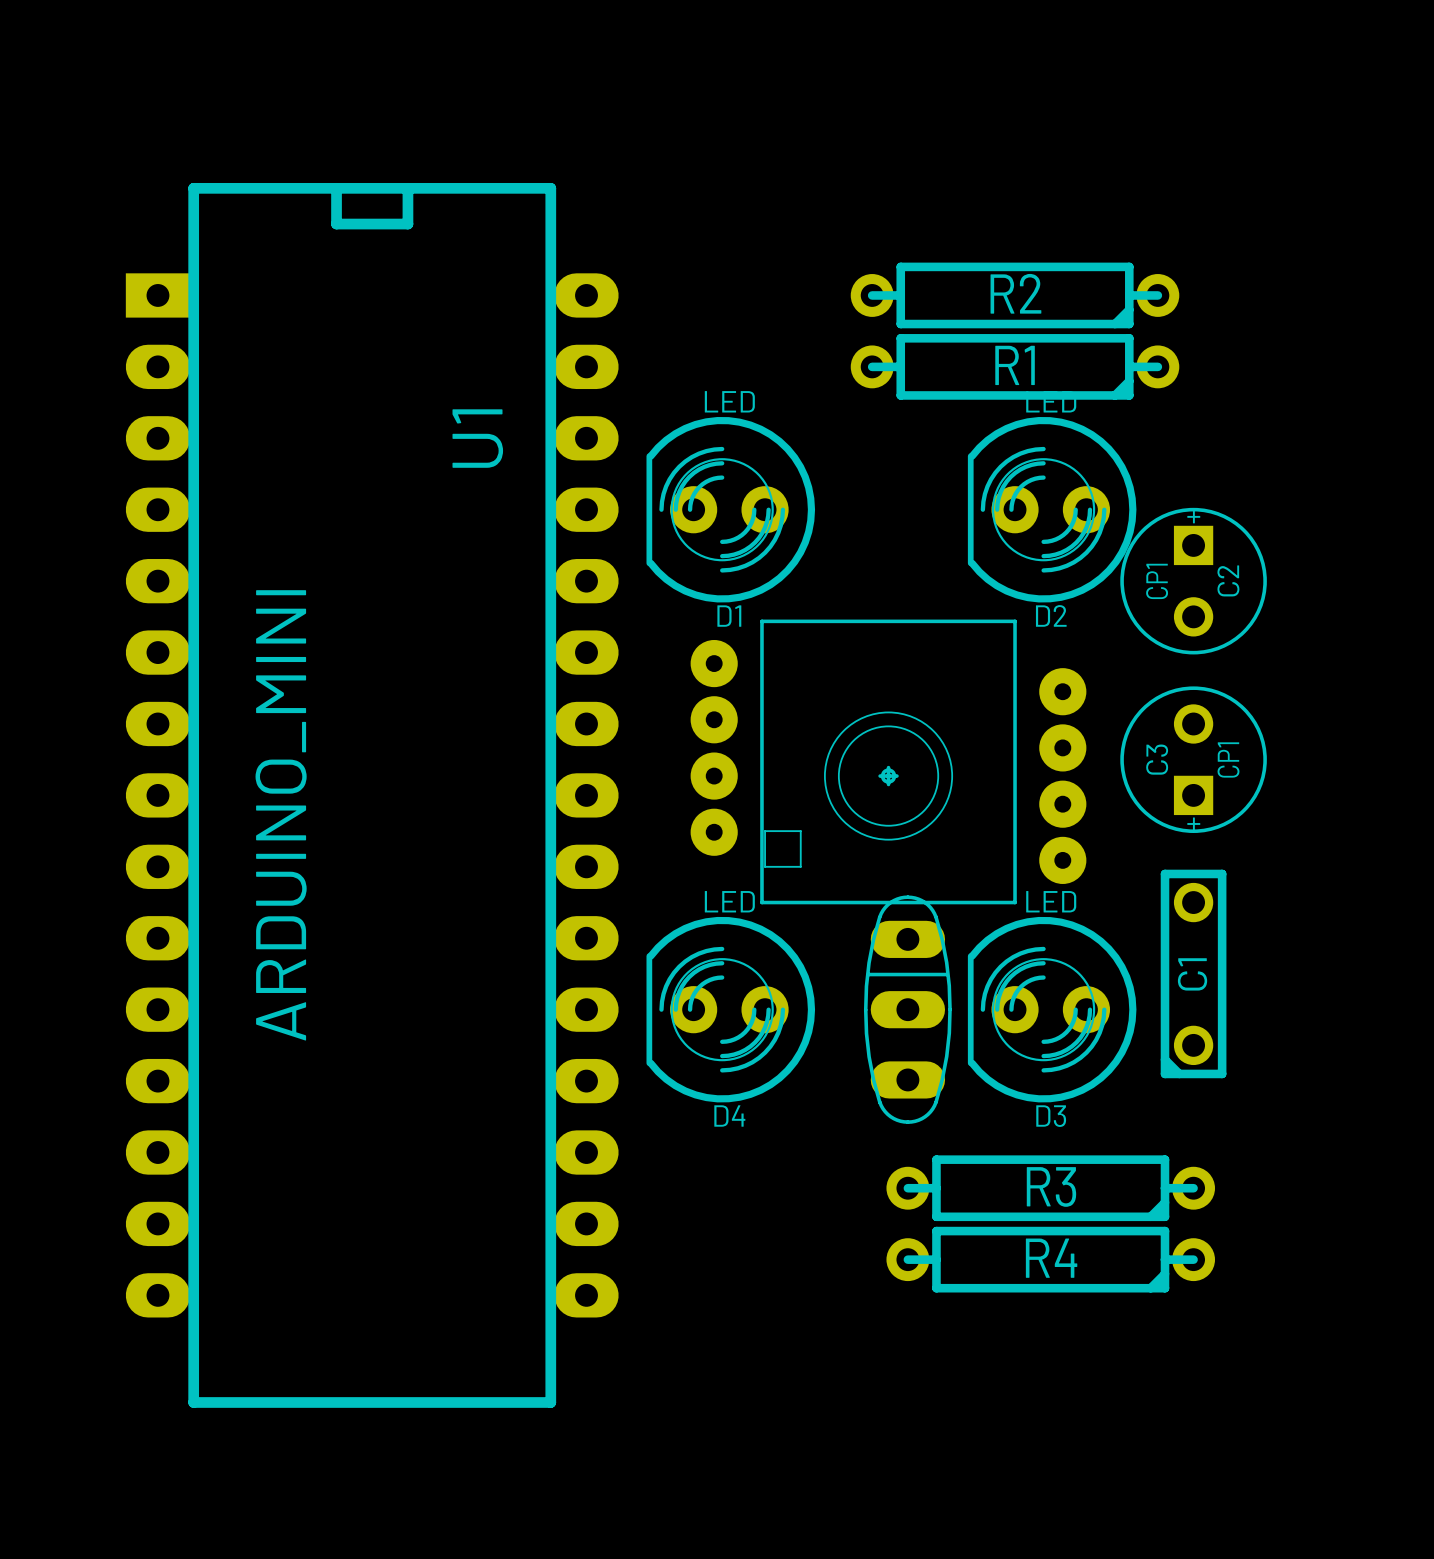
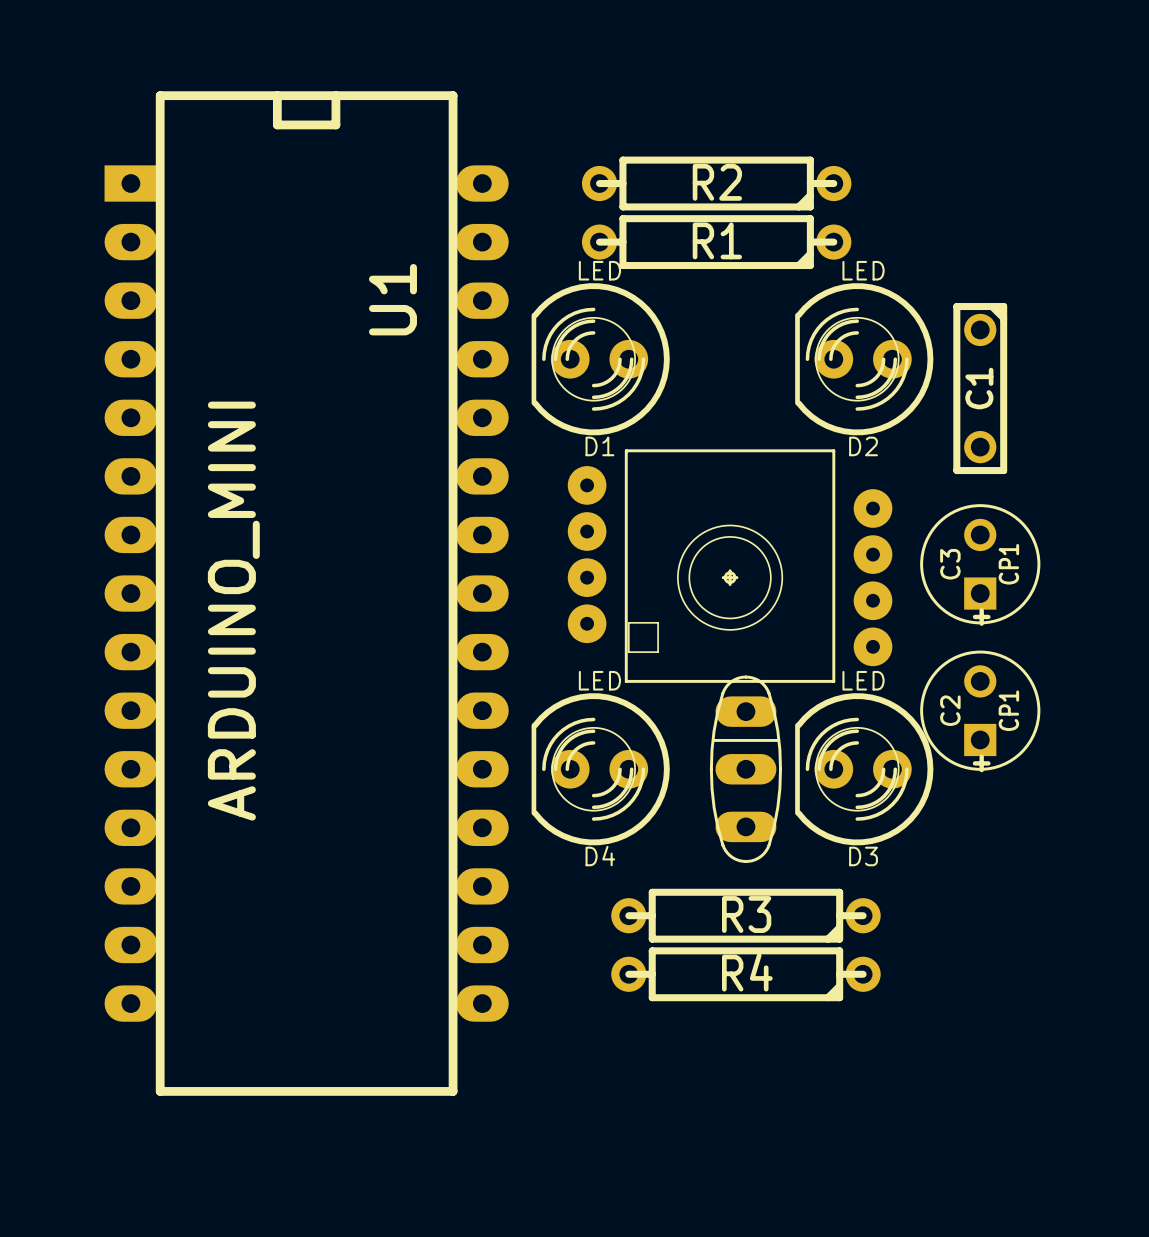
R2 position: (1015, 295) -> (716, 183)
R1 position: (1015, 366) -> (716, 242)
C2 rotation: 0° (1193, 581) -> 180° (980, 710)
C2 position: (1193, 581) -> (980, 710)
C1 rotation: 0° (1193, 973) -> 180° (980, 388)
C1 position: (1193, 973) -> (980, 388)
R3 position: (1050, 1188) -> (745, 915)
R4 position: (1050, 1259) -> (745, 974)

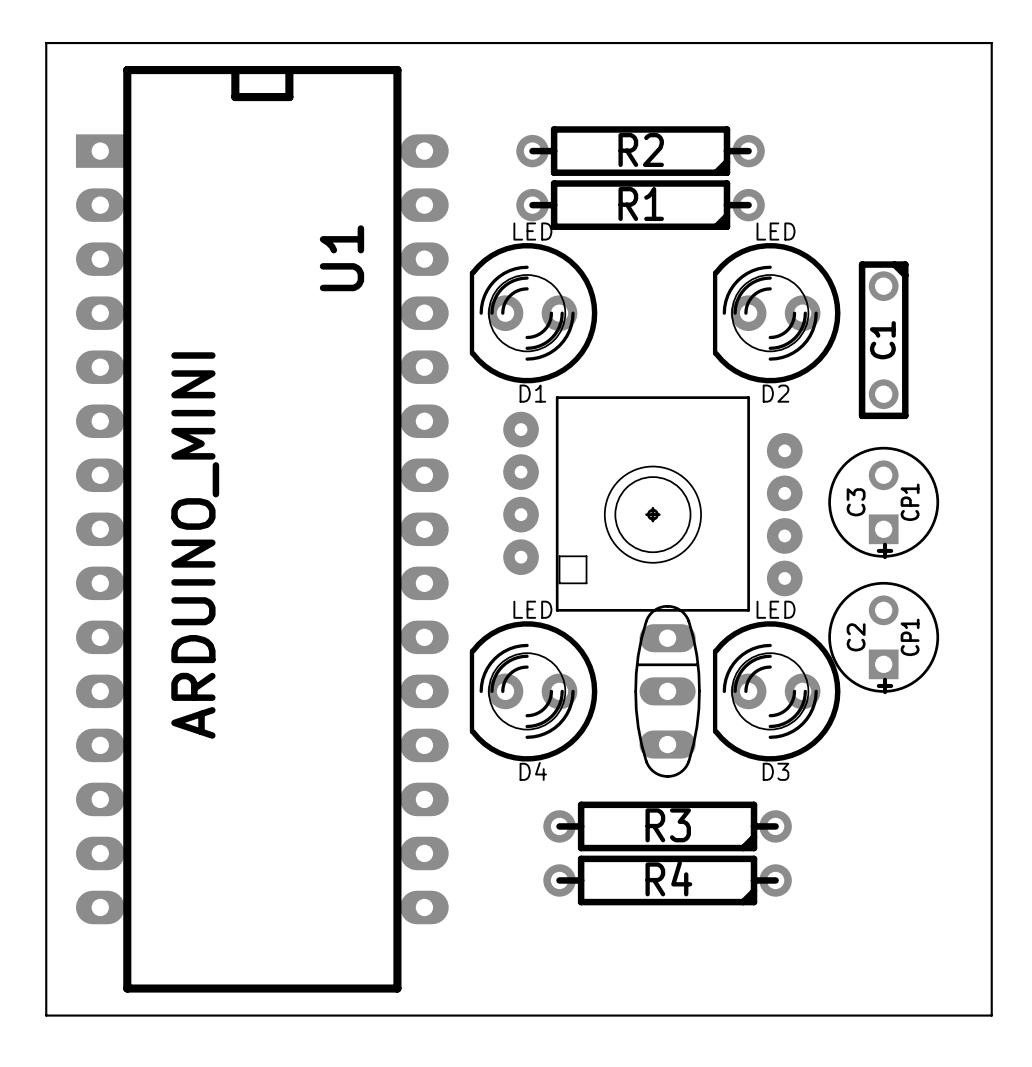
board edge: none -> (46, 43) (46, 1015) (991, 1015) (991, 43) (46, 43)

